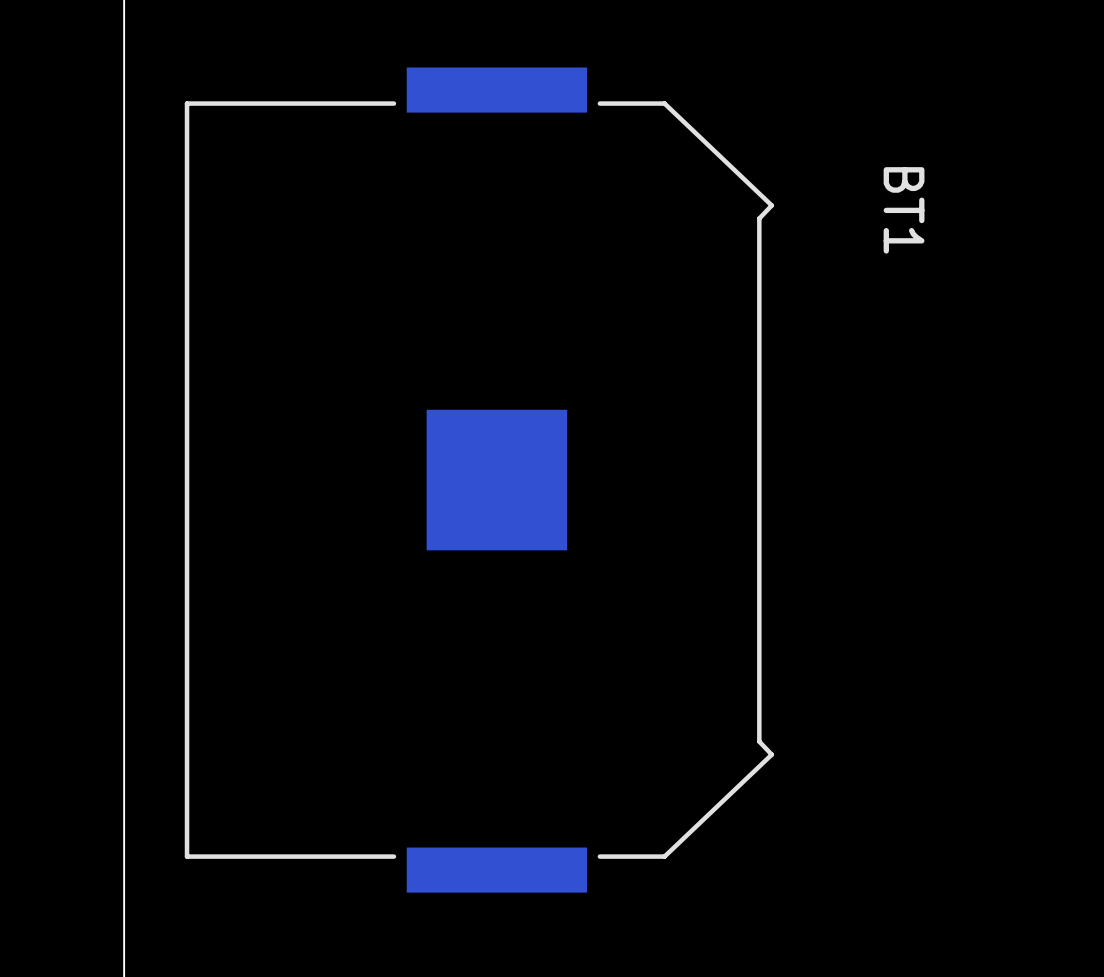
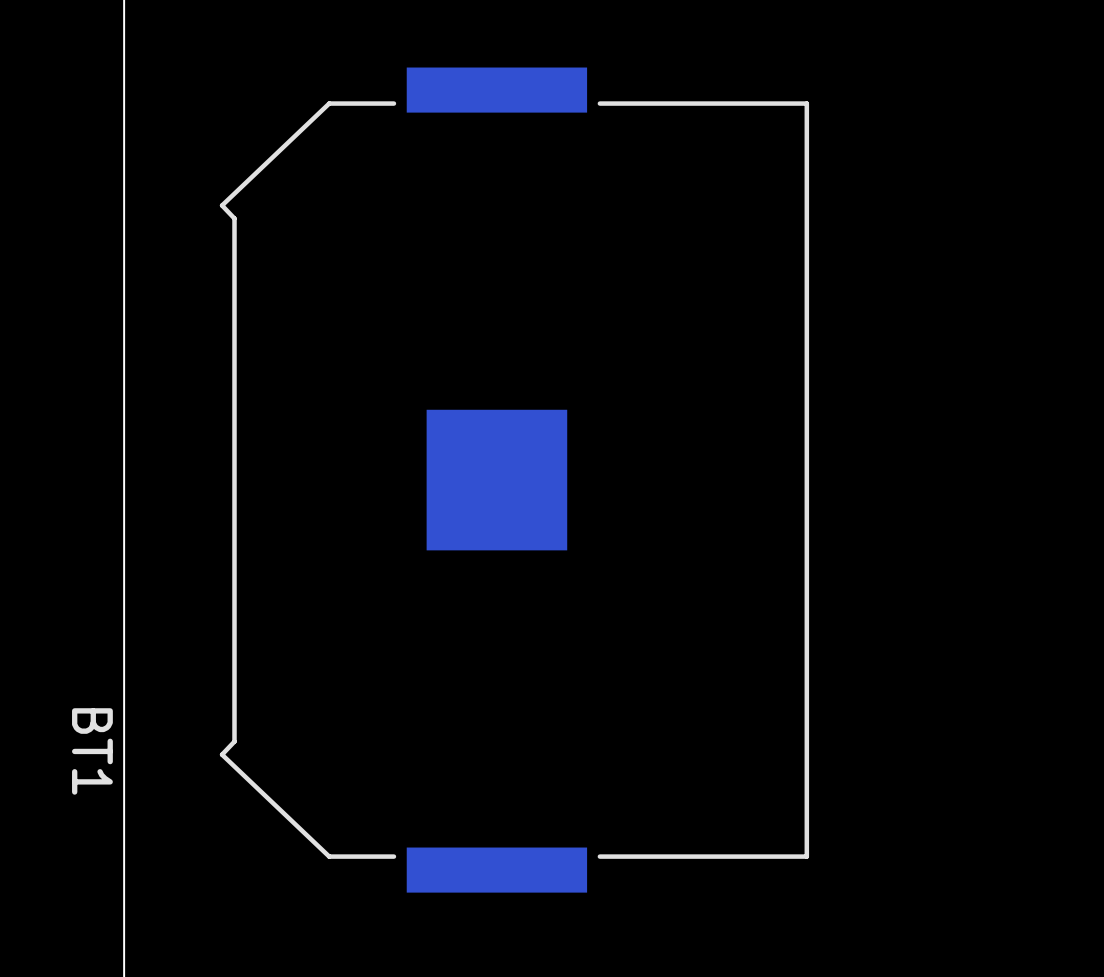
BT1 rotation: 0° (479, 480) -> 180° (514, 480)

